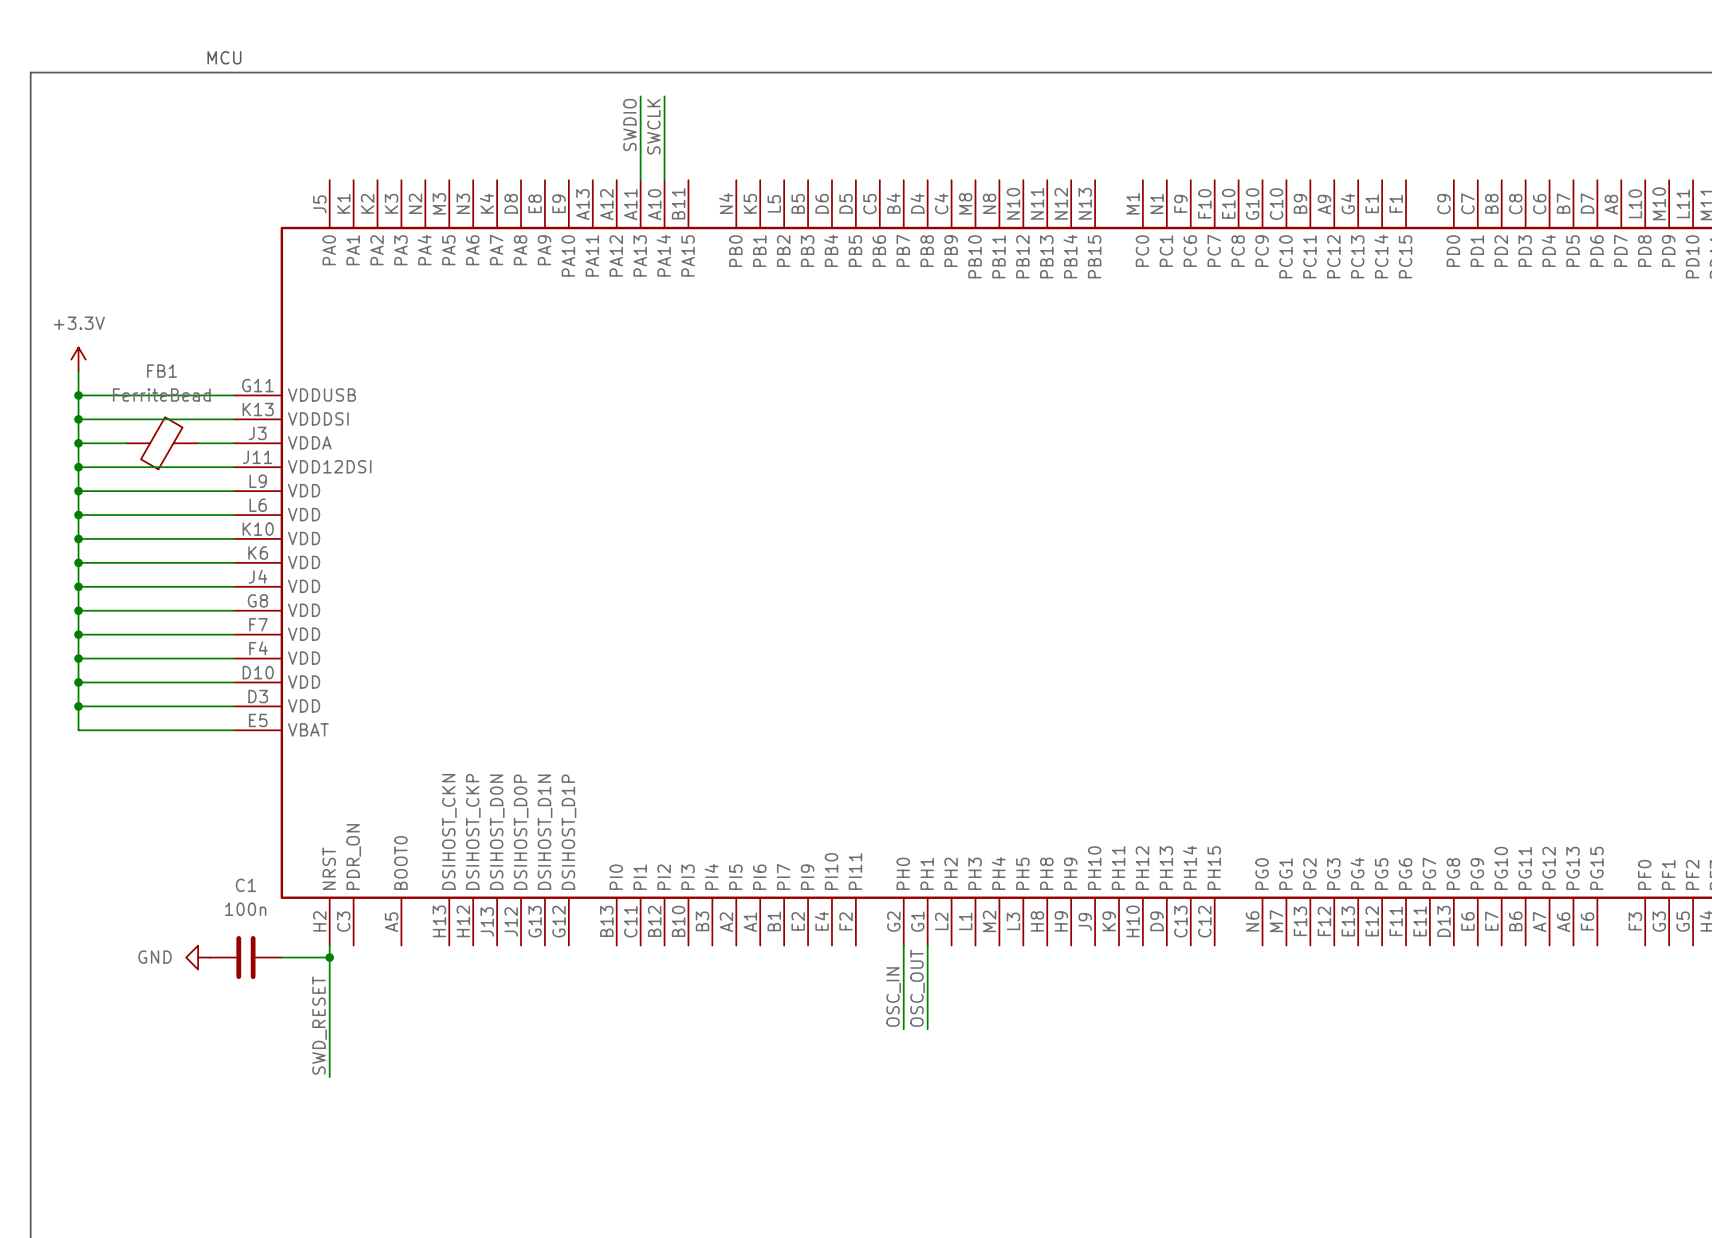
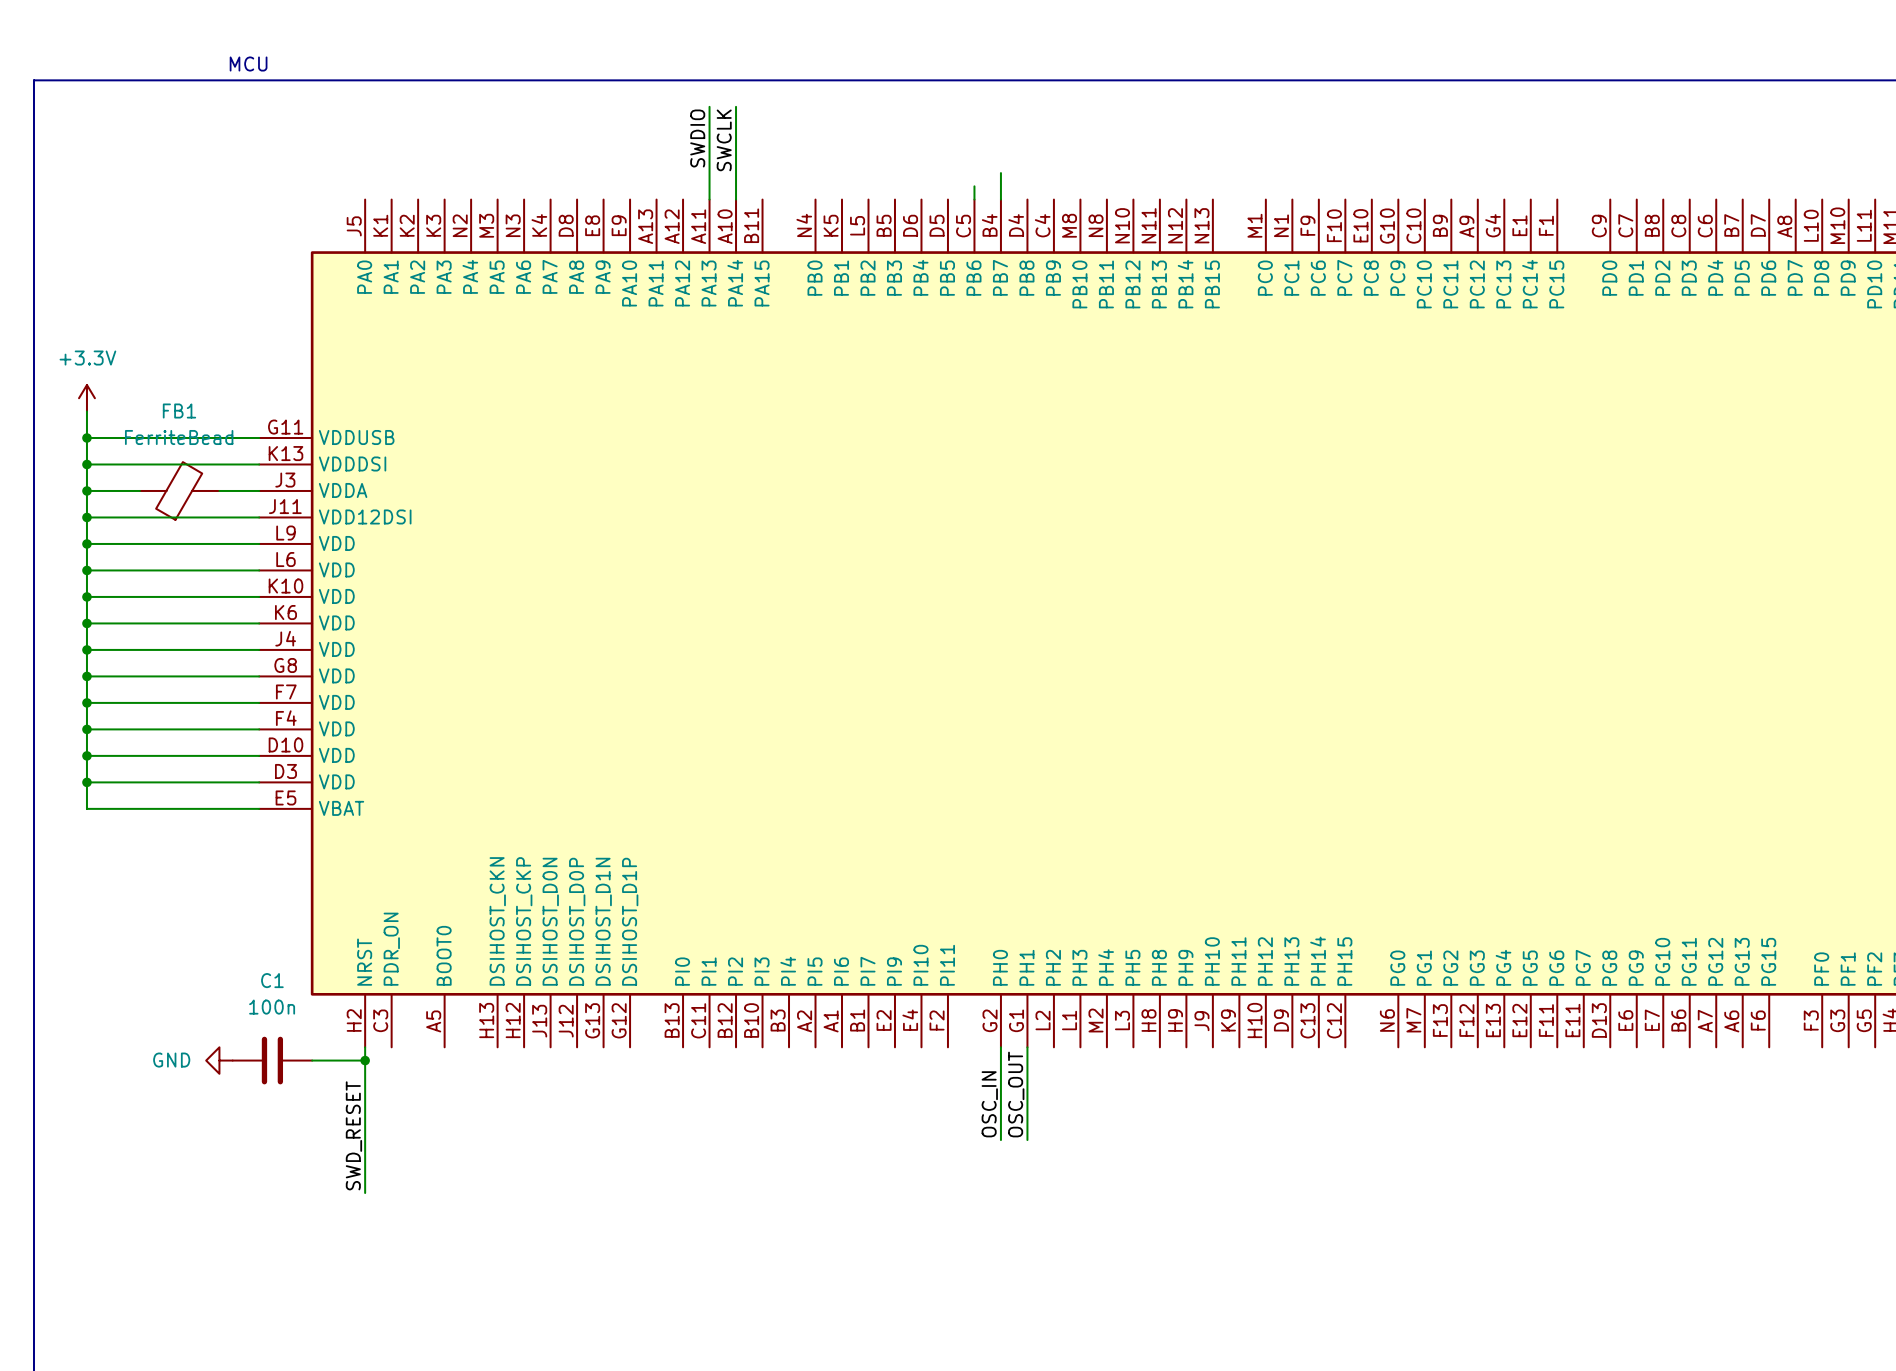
wire: none -> (1000, 173) (1000, 199)
wire: none -> (974, 186) (974, 199)

